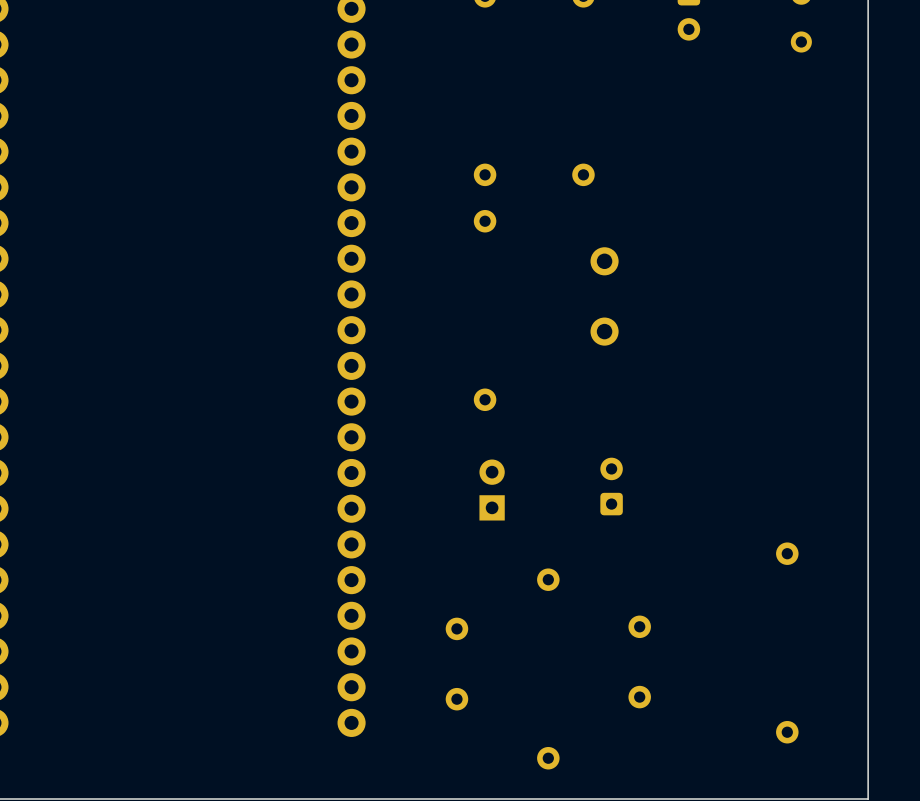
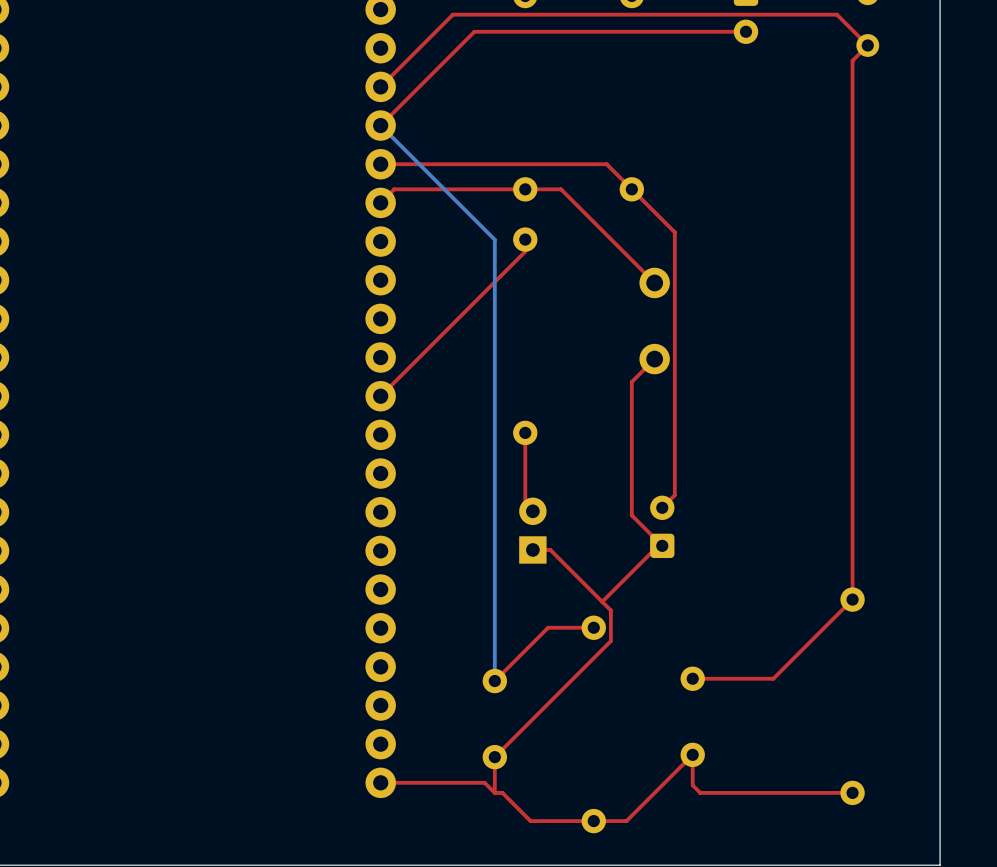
top track: none -> (746, 31) (474, 31) (380, 125)
top track: none -> (380, 86) (452, 14) (836, 14) (867, 45) (852, 60) (852, 599) (773, 678) (692, 678)
bottom track: none -> (380, 125) (494, 239) (494, 681)
top track: none -> (380, 164) (606, 164) (674, 232) (674, 495) (662, 507)
top track: none -> (380, 202) (394, 189) (561, 189) (654, 282)
top track: none -> (525, 239) (525, 251) (380, 396)
top track: none -> (654, 359) (631, 381) (631, 515) (662, 545) (658, 545) (602, 601)
top track: none -> (525, 432) (525, 503) (532, 511)
top track: none -> (532, 549) (550, 549) (610, 610) (610, 641) (494, 757) (494, 792)
top track: none -> (593, 627) (548, 627) (494, 681)
top track: none -> (380, 782) (484, 782) (494, 792)
top track: none -> (852, 792) (700, 792) (692, 785) (692, 754) (626, 821) (530, 821) (502, 792) (494, 792)

